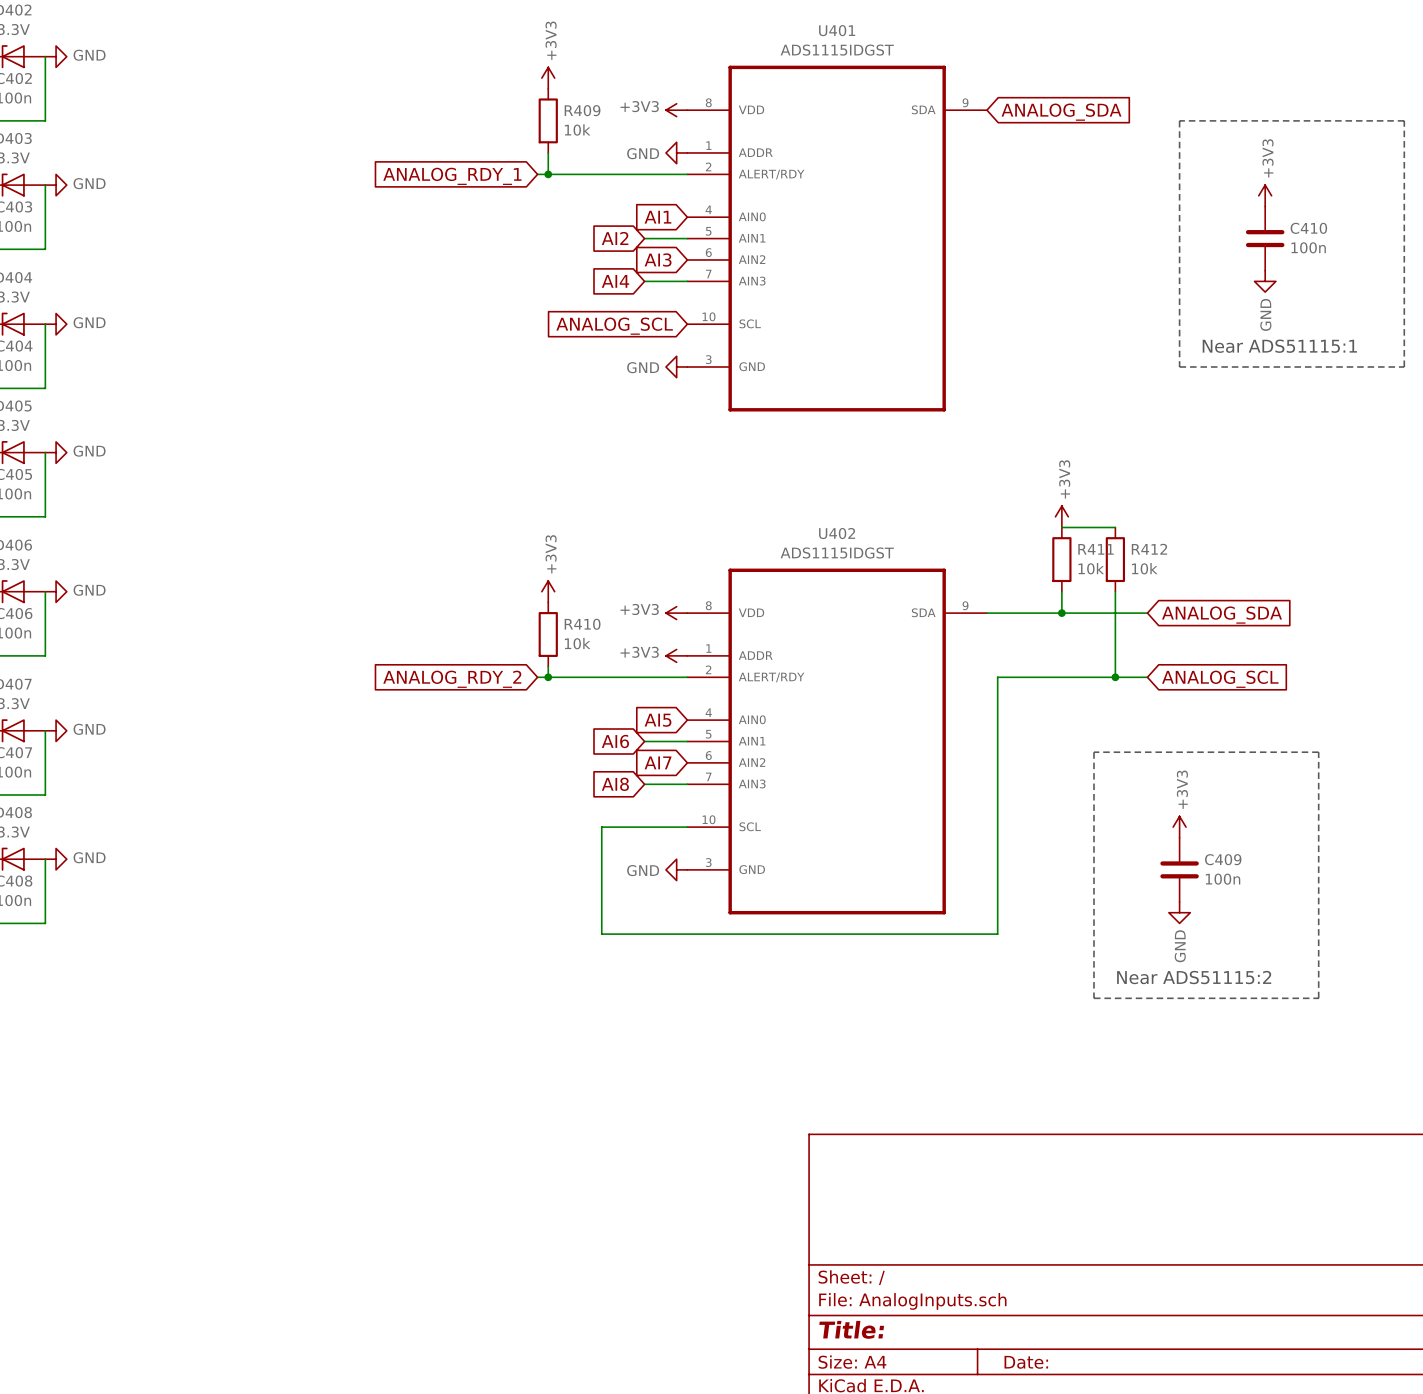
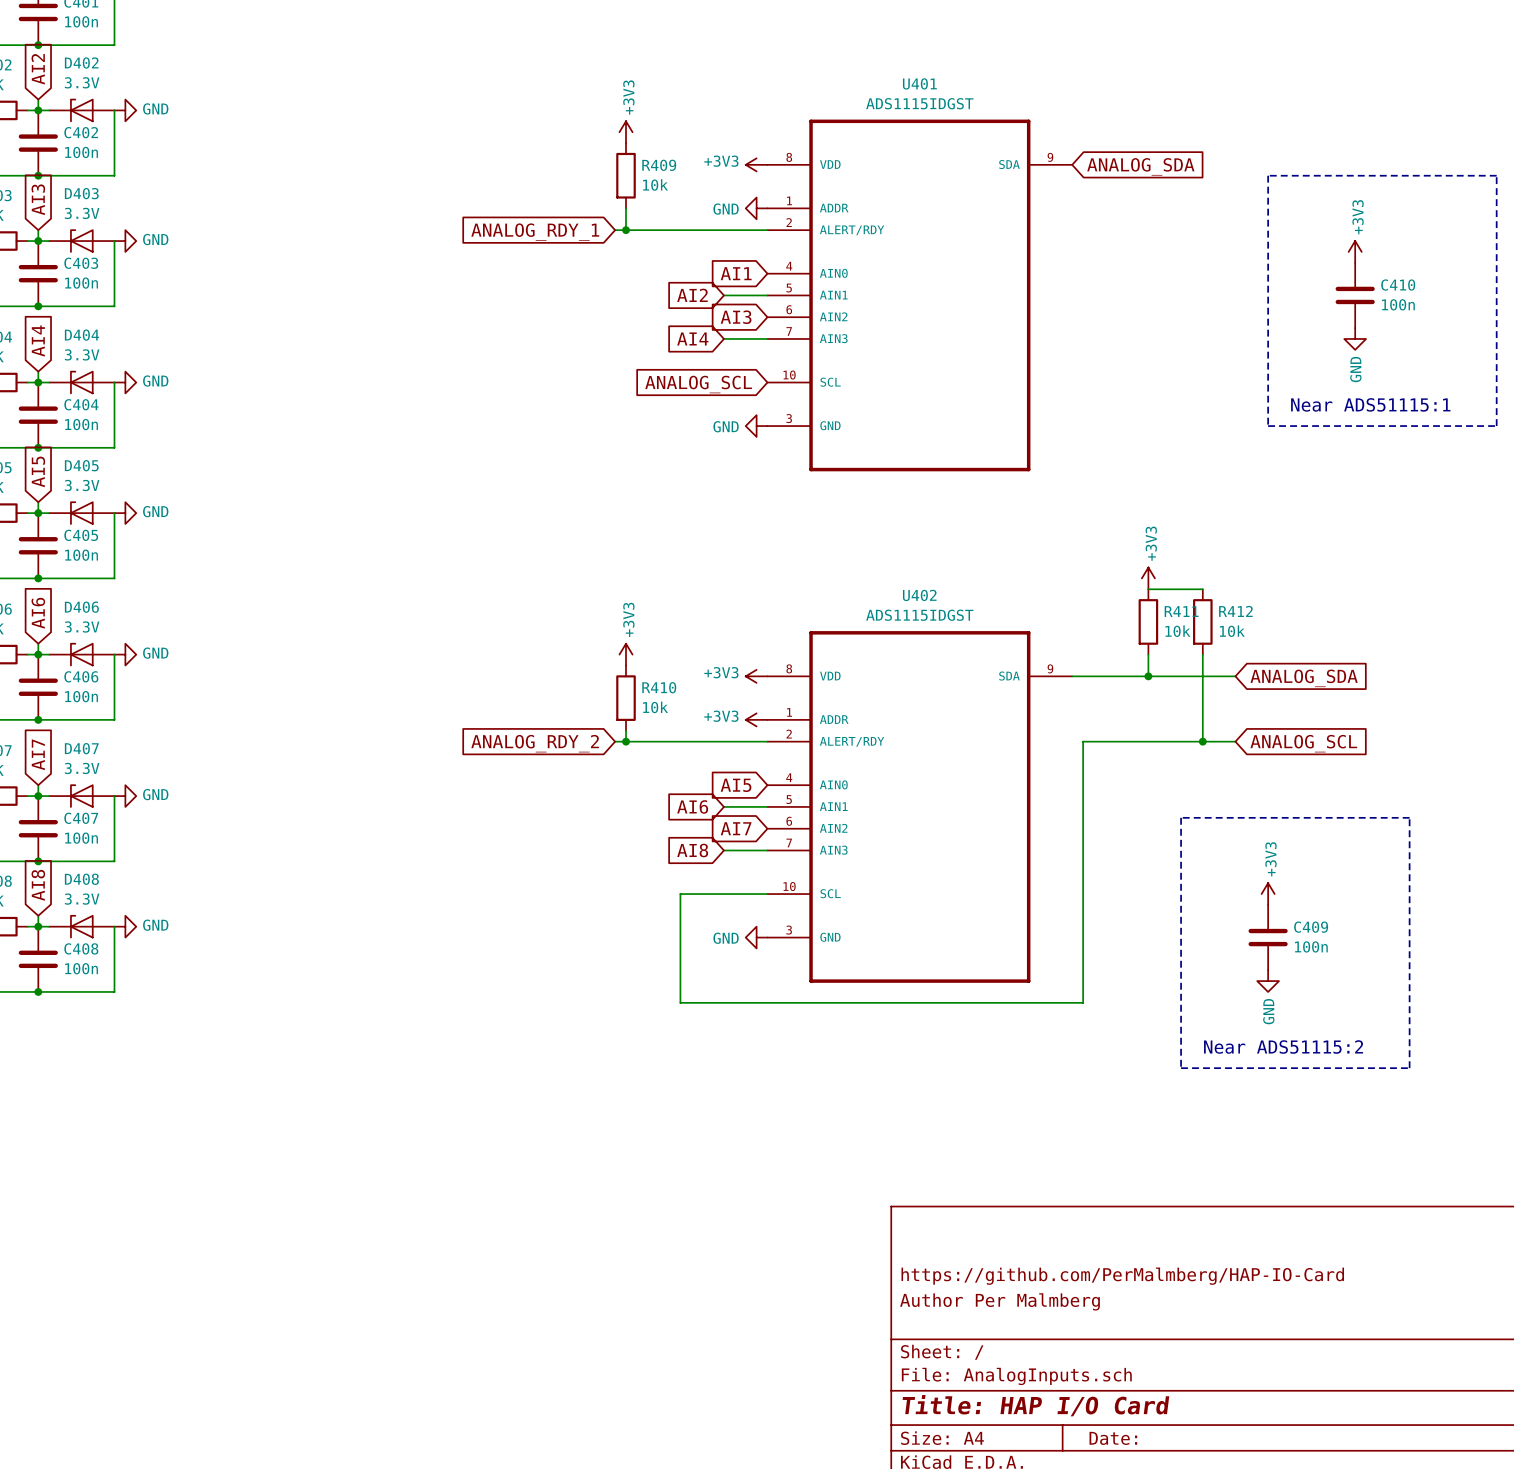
title block: none -> https://github.com/PerMalmberg/HAP-IO-Card (1122, 1276)
title block: none -> Author Per Malmberg (1000, 1301)
title block: Title: (851, 1329) -> Title: HAP I/O Card (1035, 1405)

